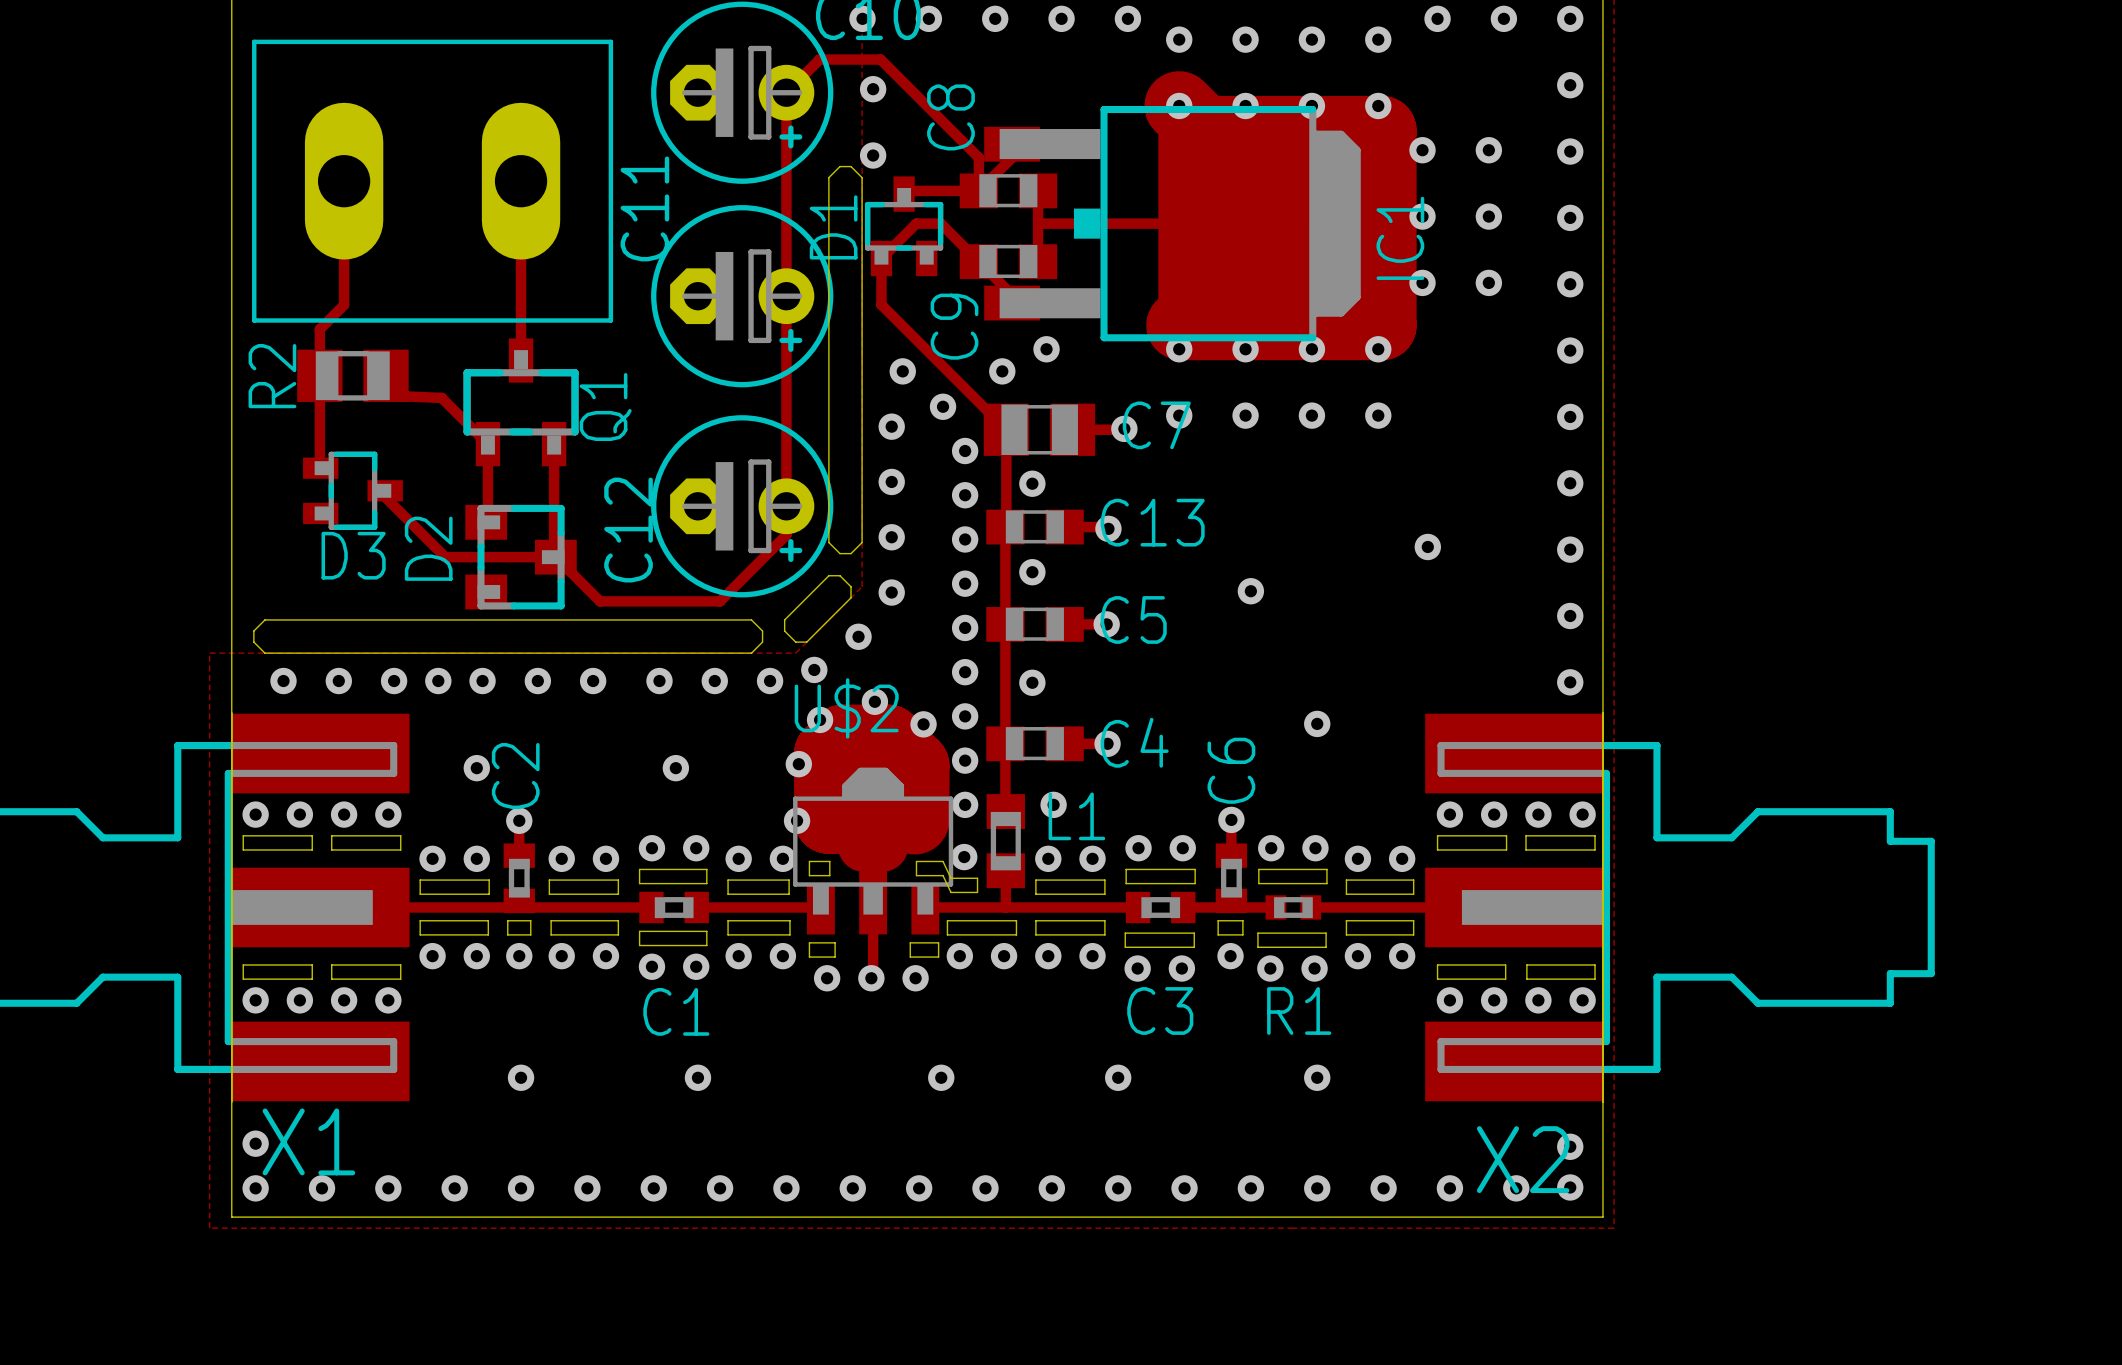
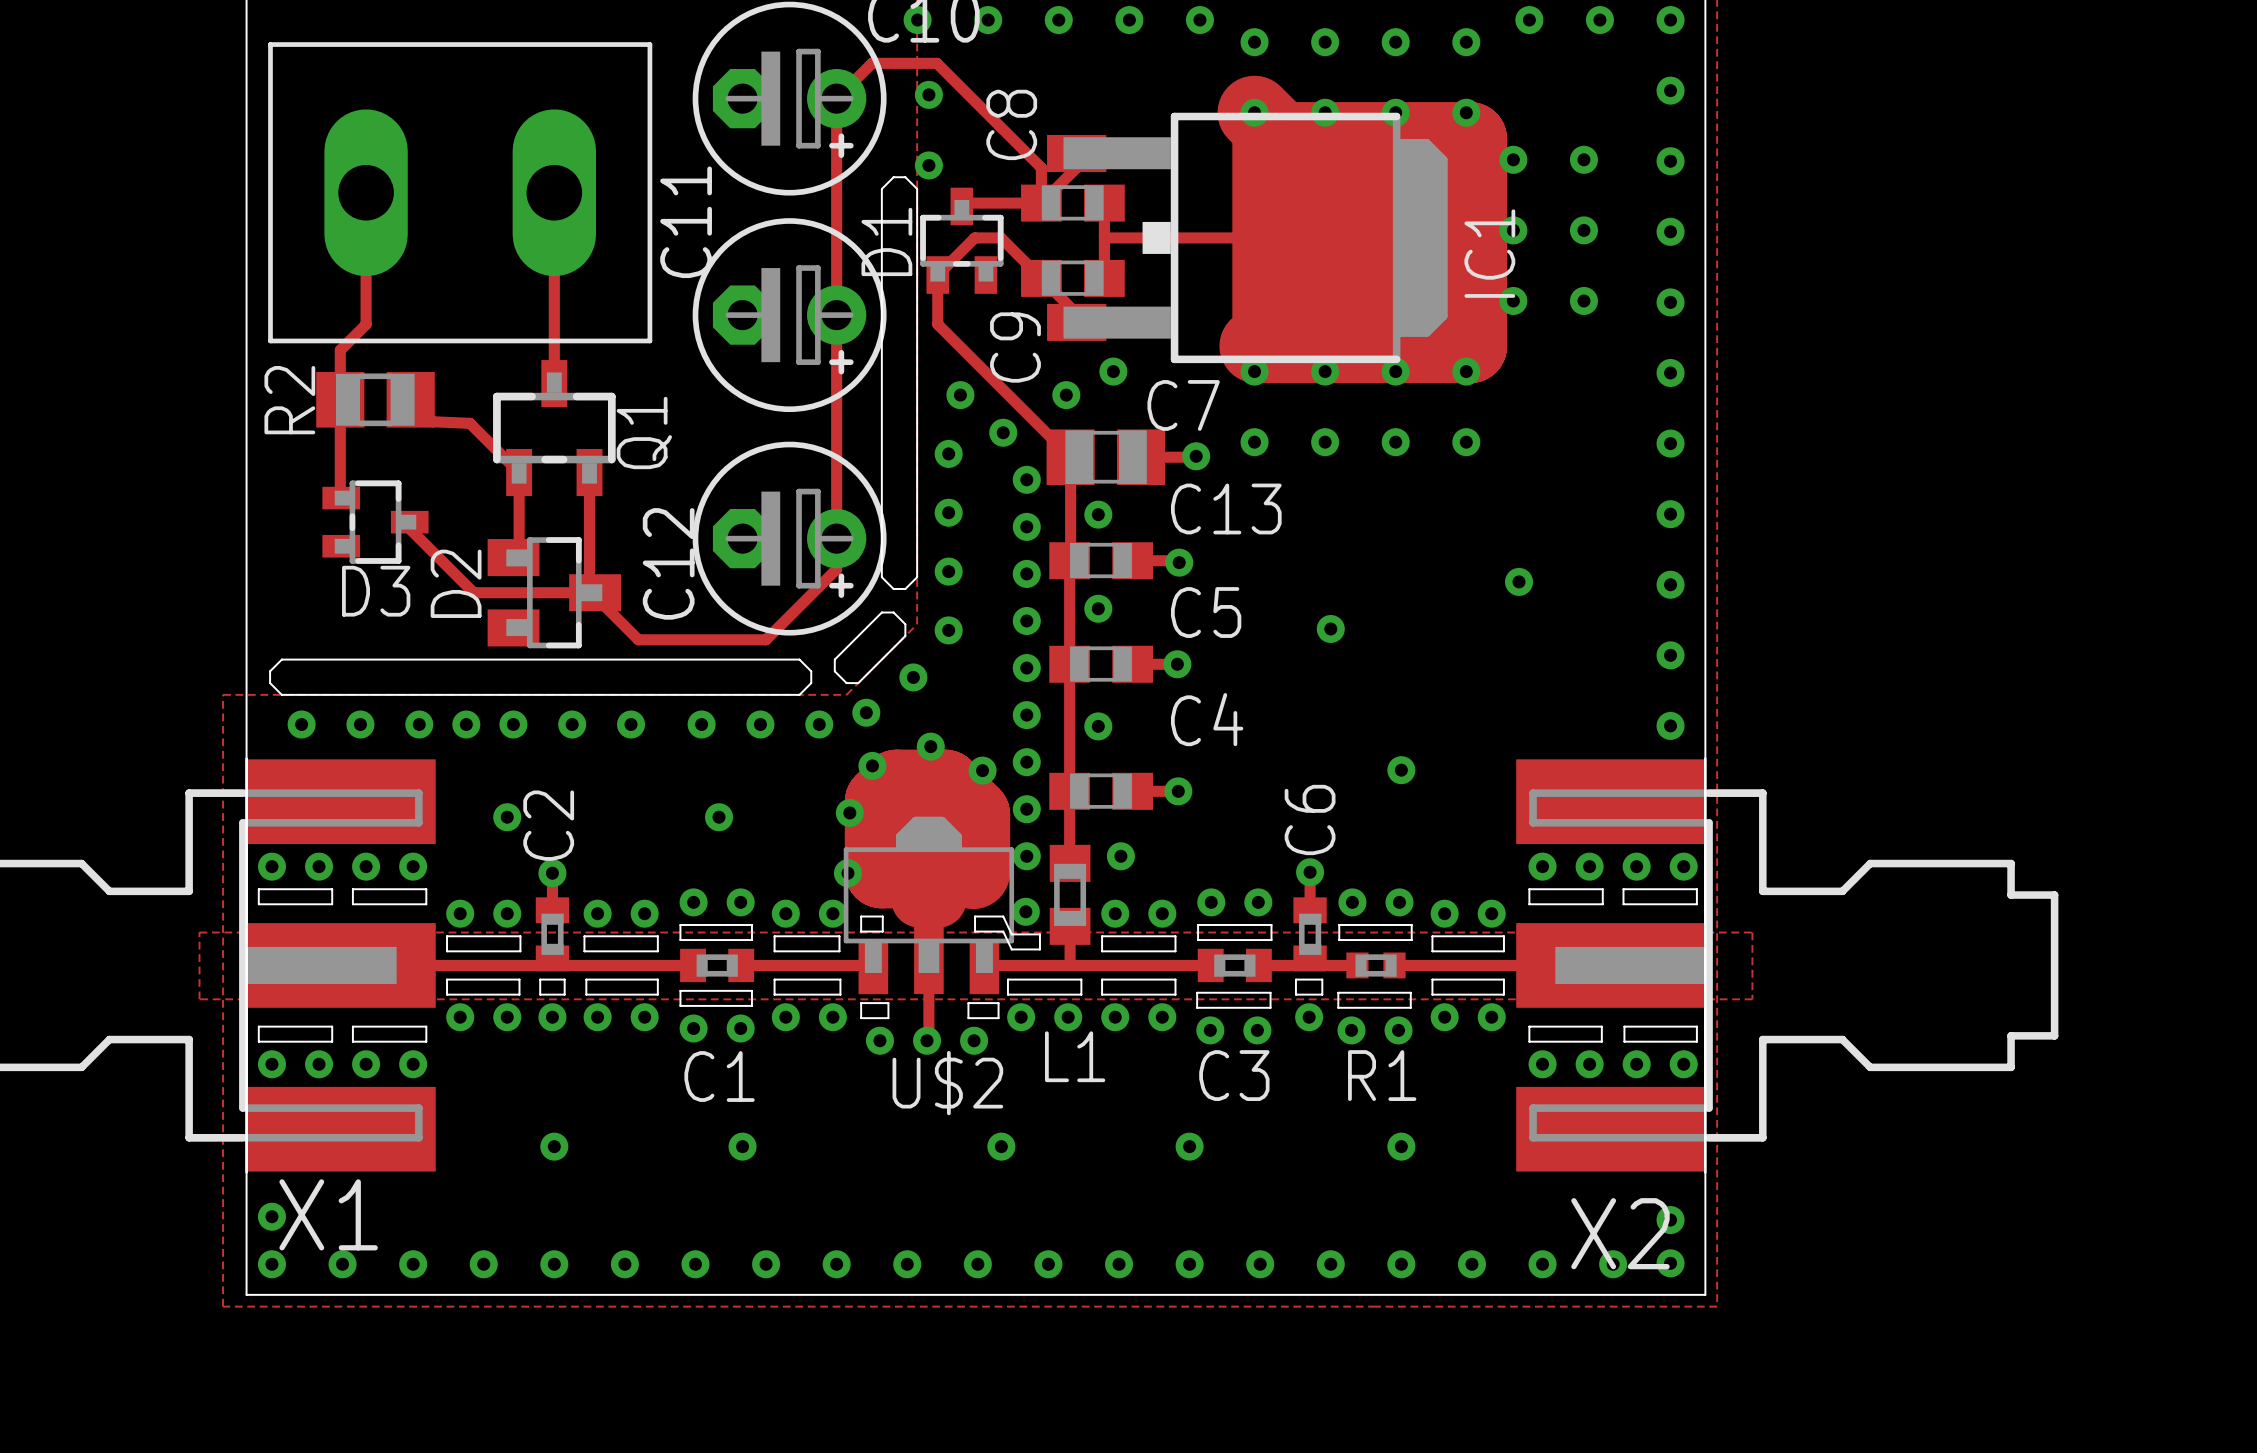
C7 name position: C7 (1156, 425) -> C7 (1183, 405)
D2 footprint: [465, 504, 577, 610] -> [487, 537, 622, 649]
C13 name position: C13 (1152, 522) -> C13 (1226, 508)
C5 name position: C5 (1133, 619) -> C5 (1206, 612)
U$2 name position: U$2 (846, 708) -> U$2 (947, 1083)
C4 name position: C4 (1134, 742) -> C4 (1207, 719)
L1 name position: L1 (1076, 816) -> L1 (1075, 1056)
zone outline: none -> (199, 932) (1752, 932) (1752, 999) (199, 999) (199, 932)

